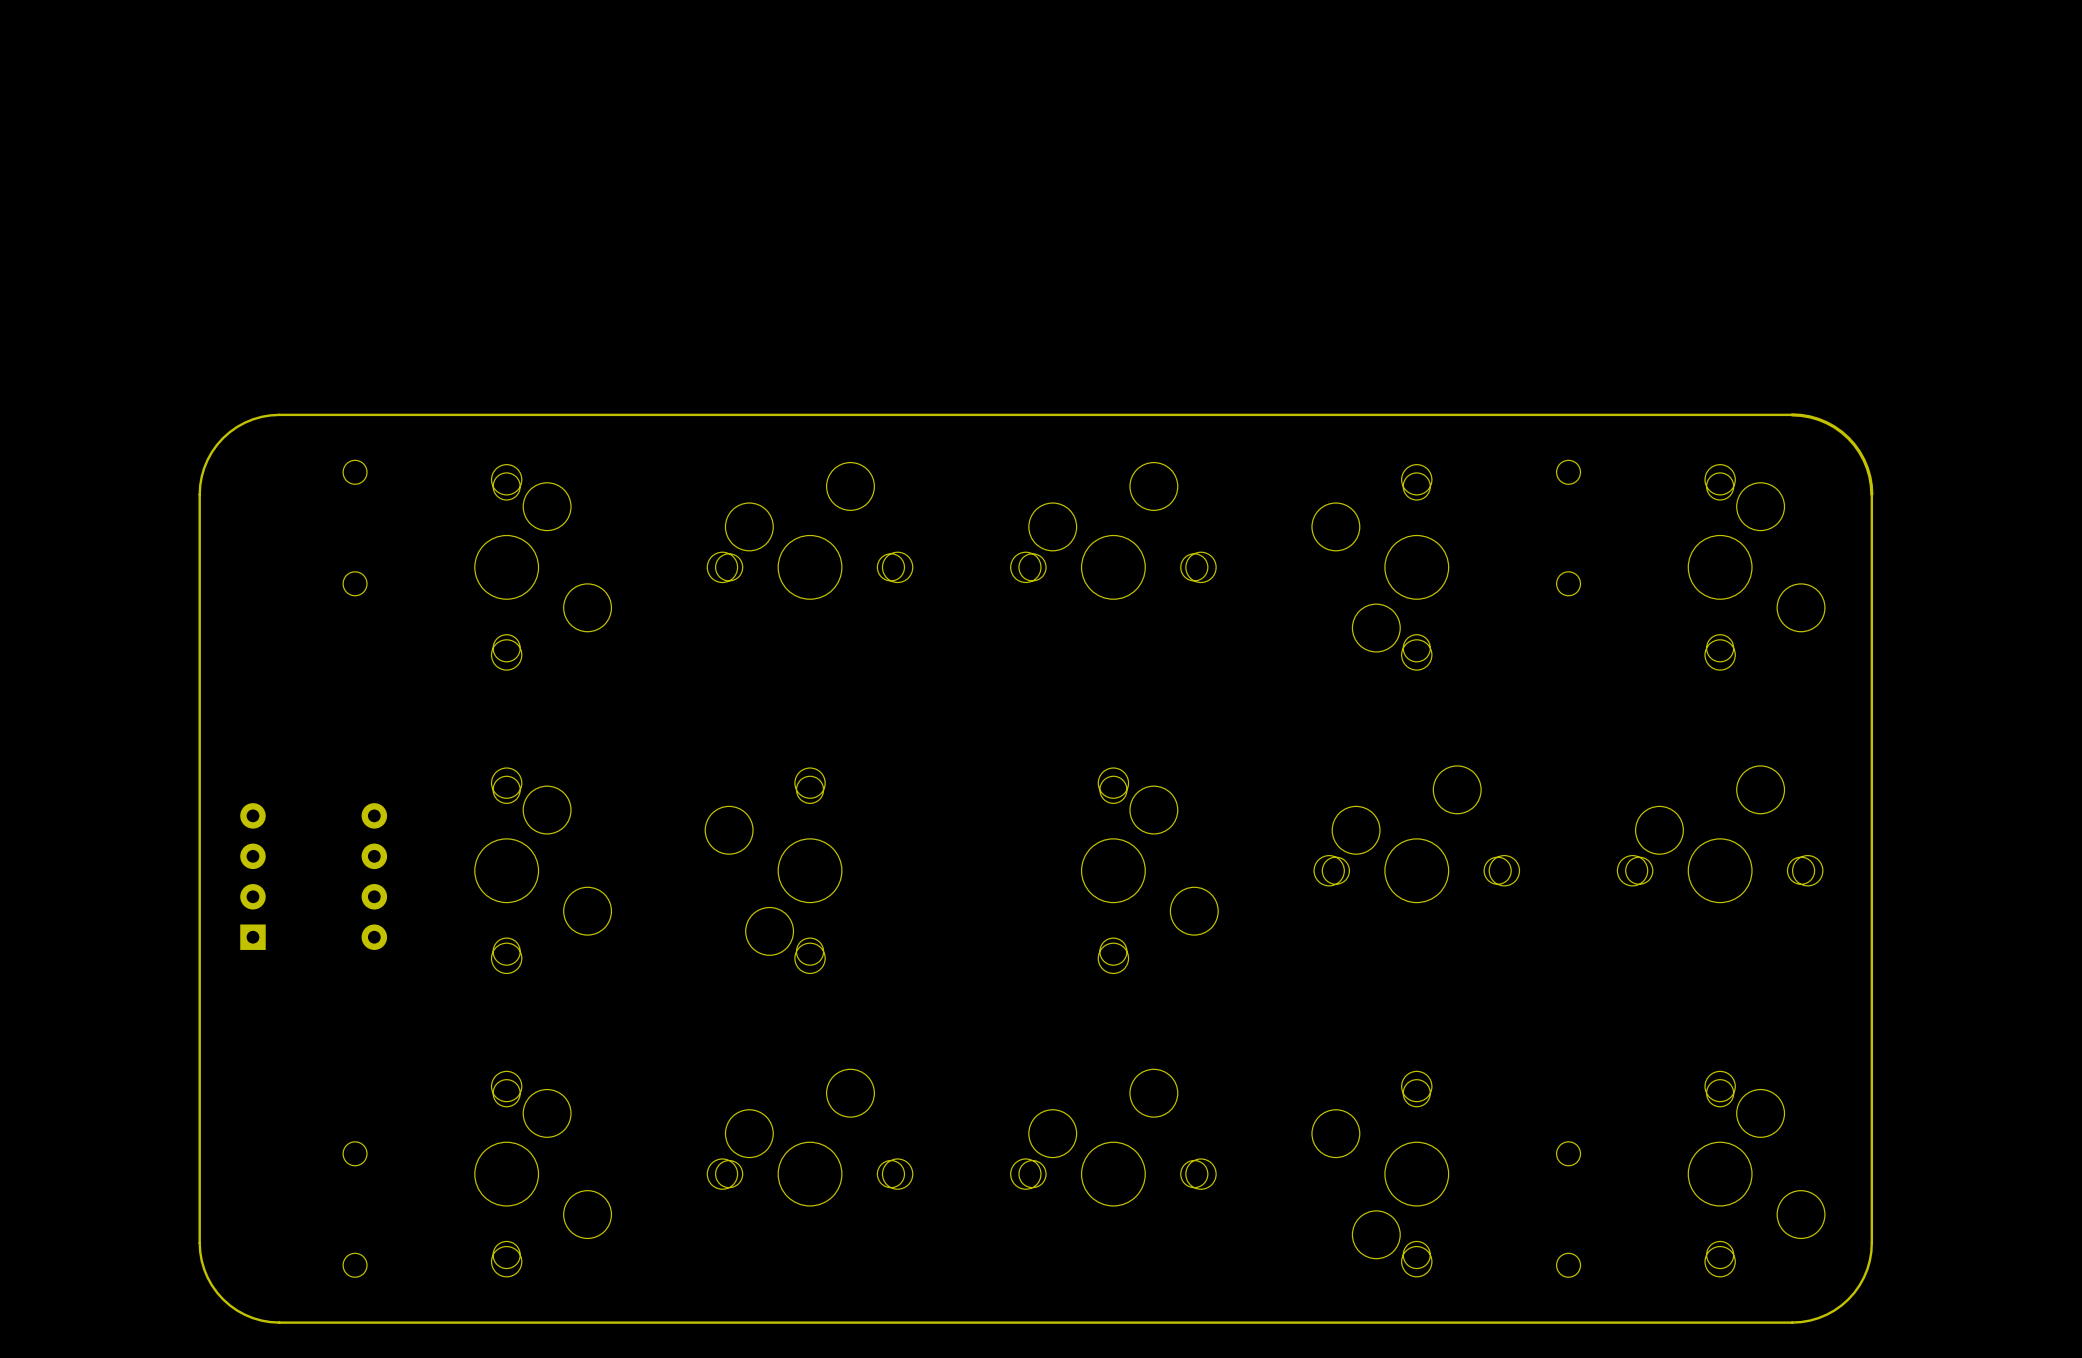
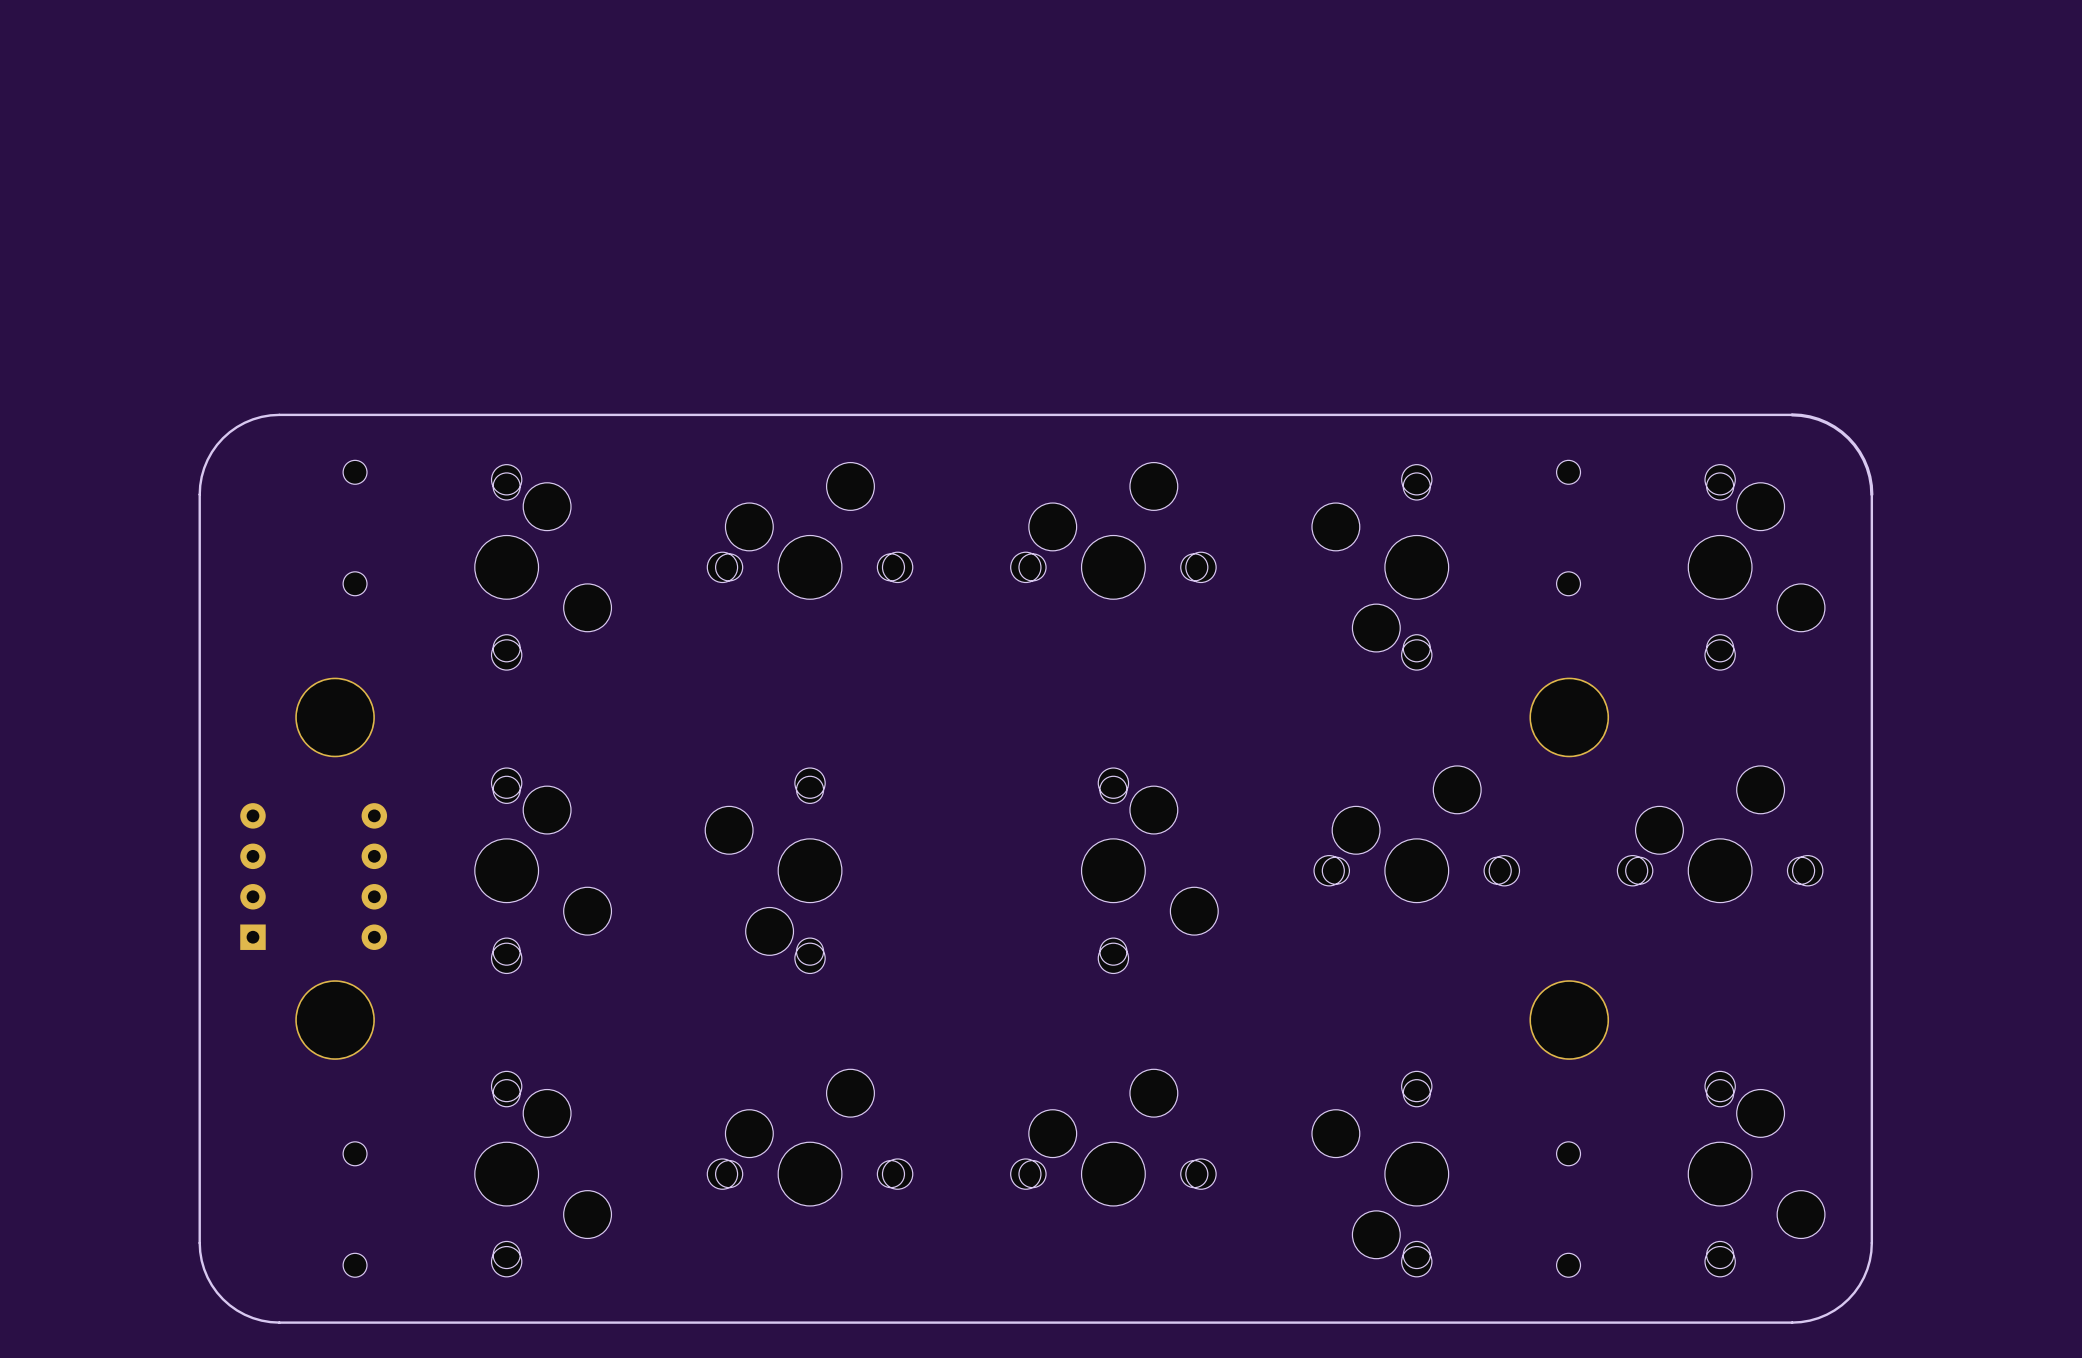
part: none -> (335, 717)
part: none -> (1569, 717)
part: none -> (335, 1020)
part: none -> (1569, 1020)

